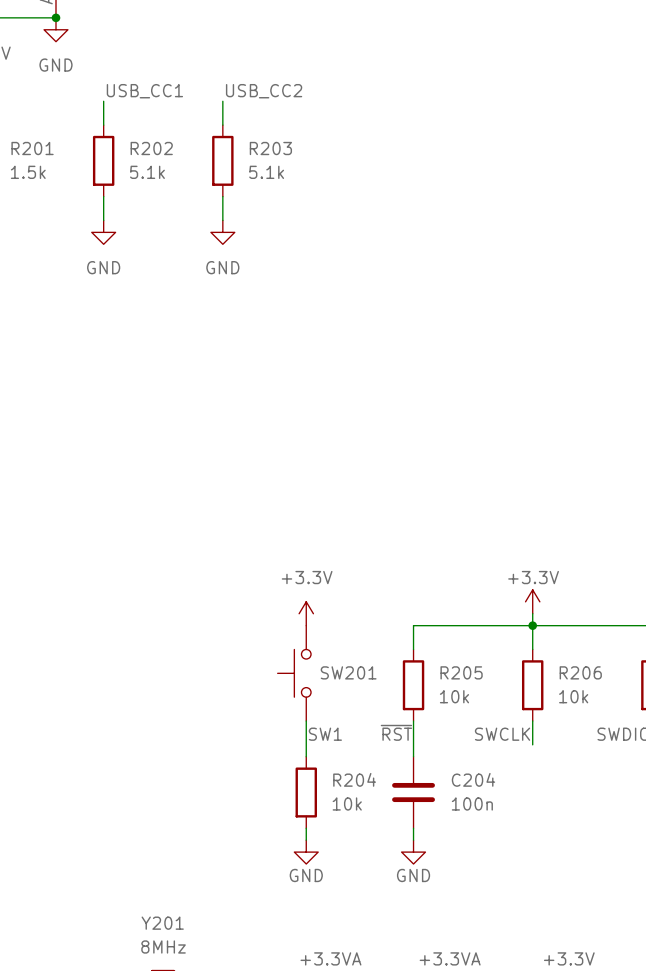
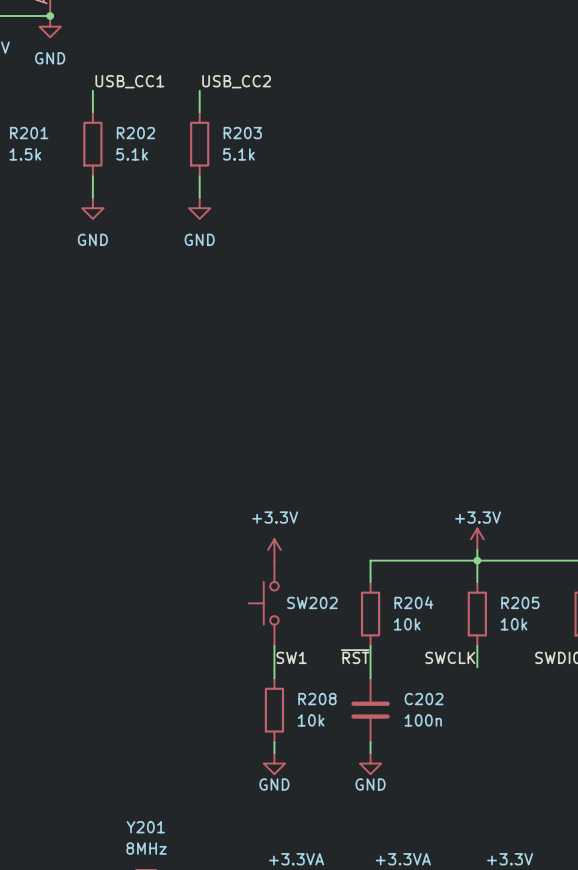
SW201 name: SW201 (348, 672) -> SW202 (312, 602)
R205 name: R205 (461, 672) -> R204 (413, 602)
R206 name: R206 (580, 672) -> R205 (520, 602)
R204 name: R204 (354, 779) -> R208 (317, 699)
C204 name: C204 (473, 779) -> C202 (424, 699)

